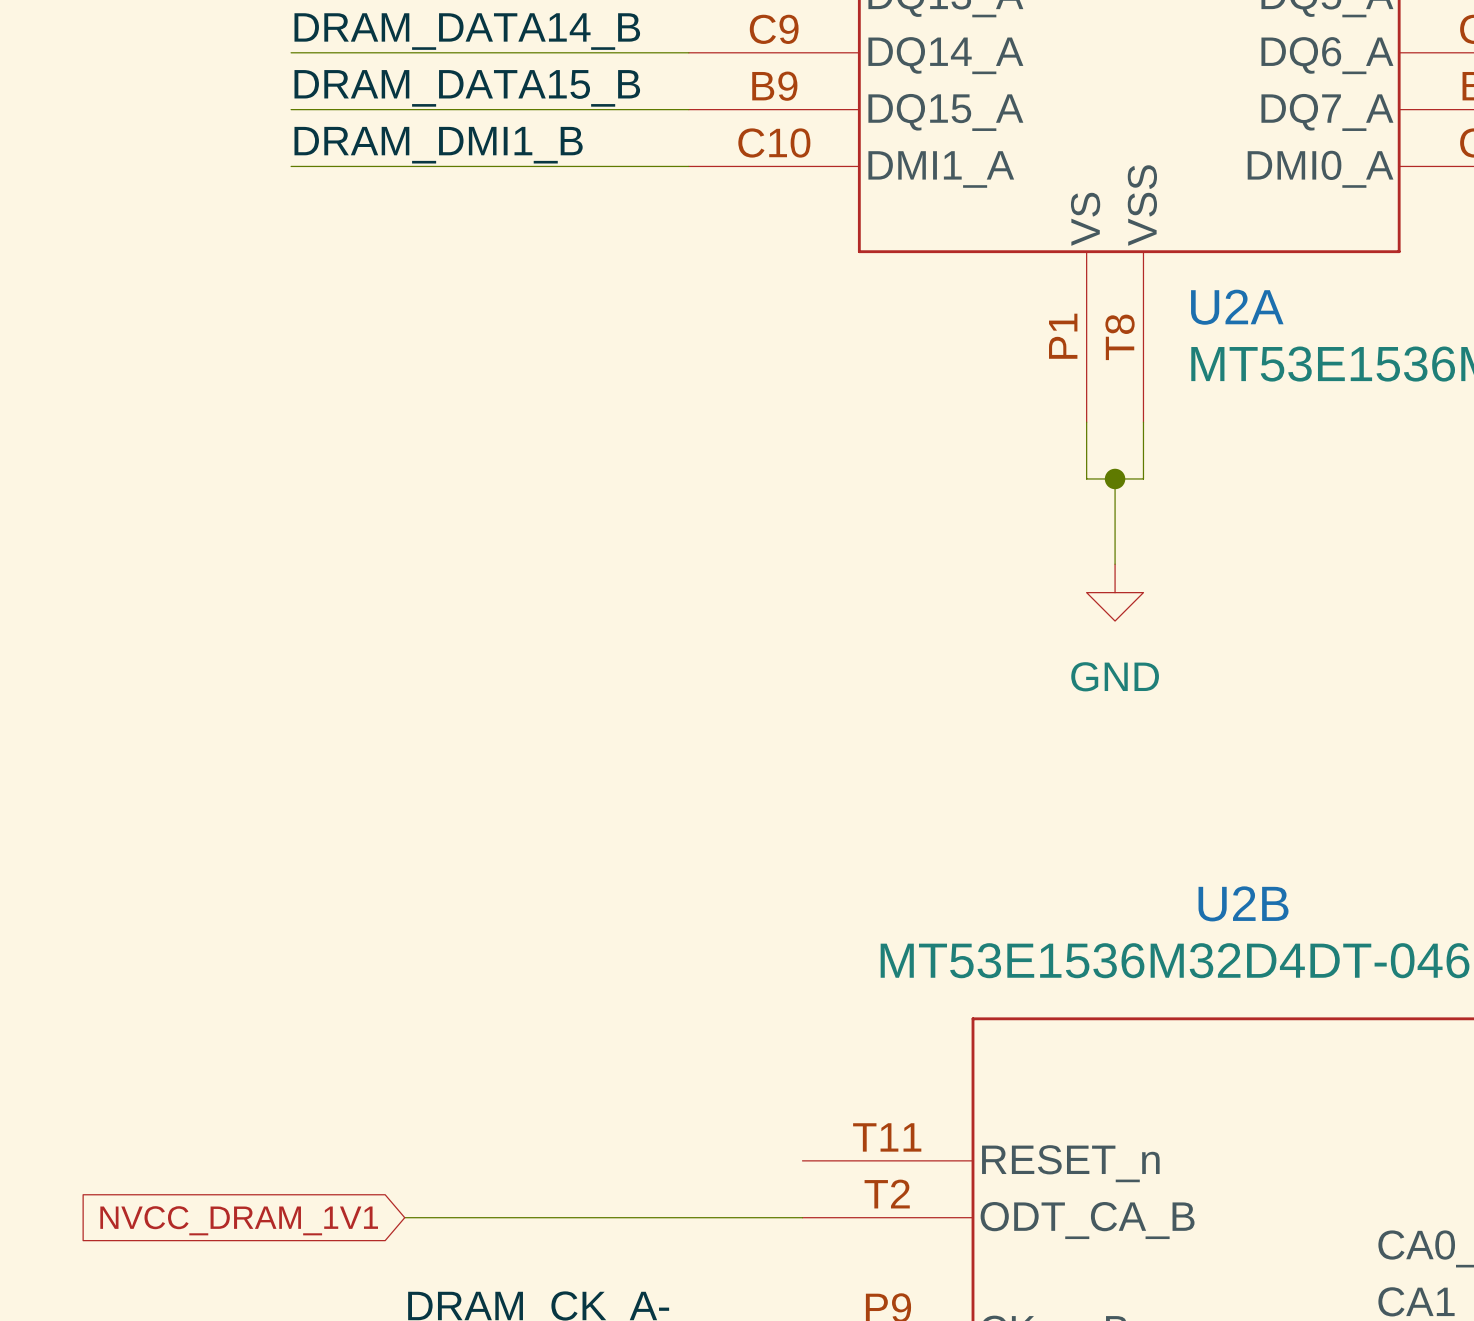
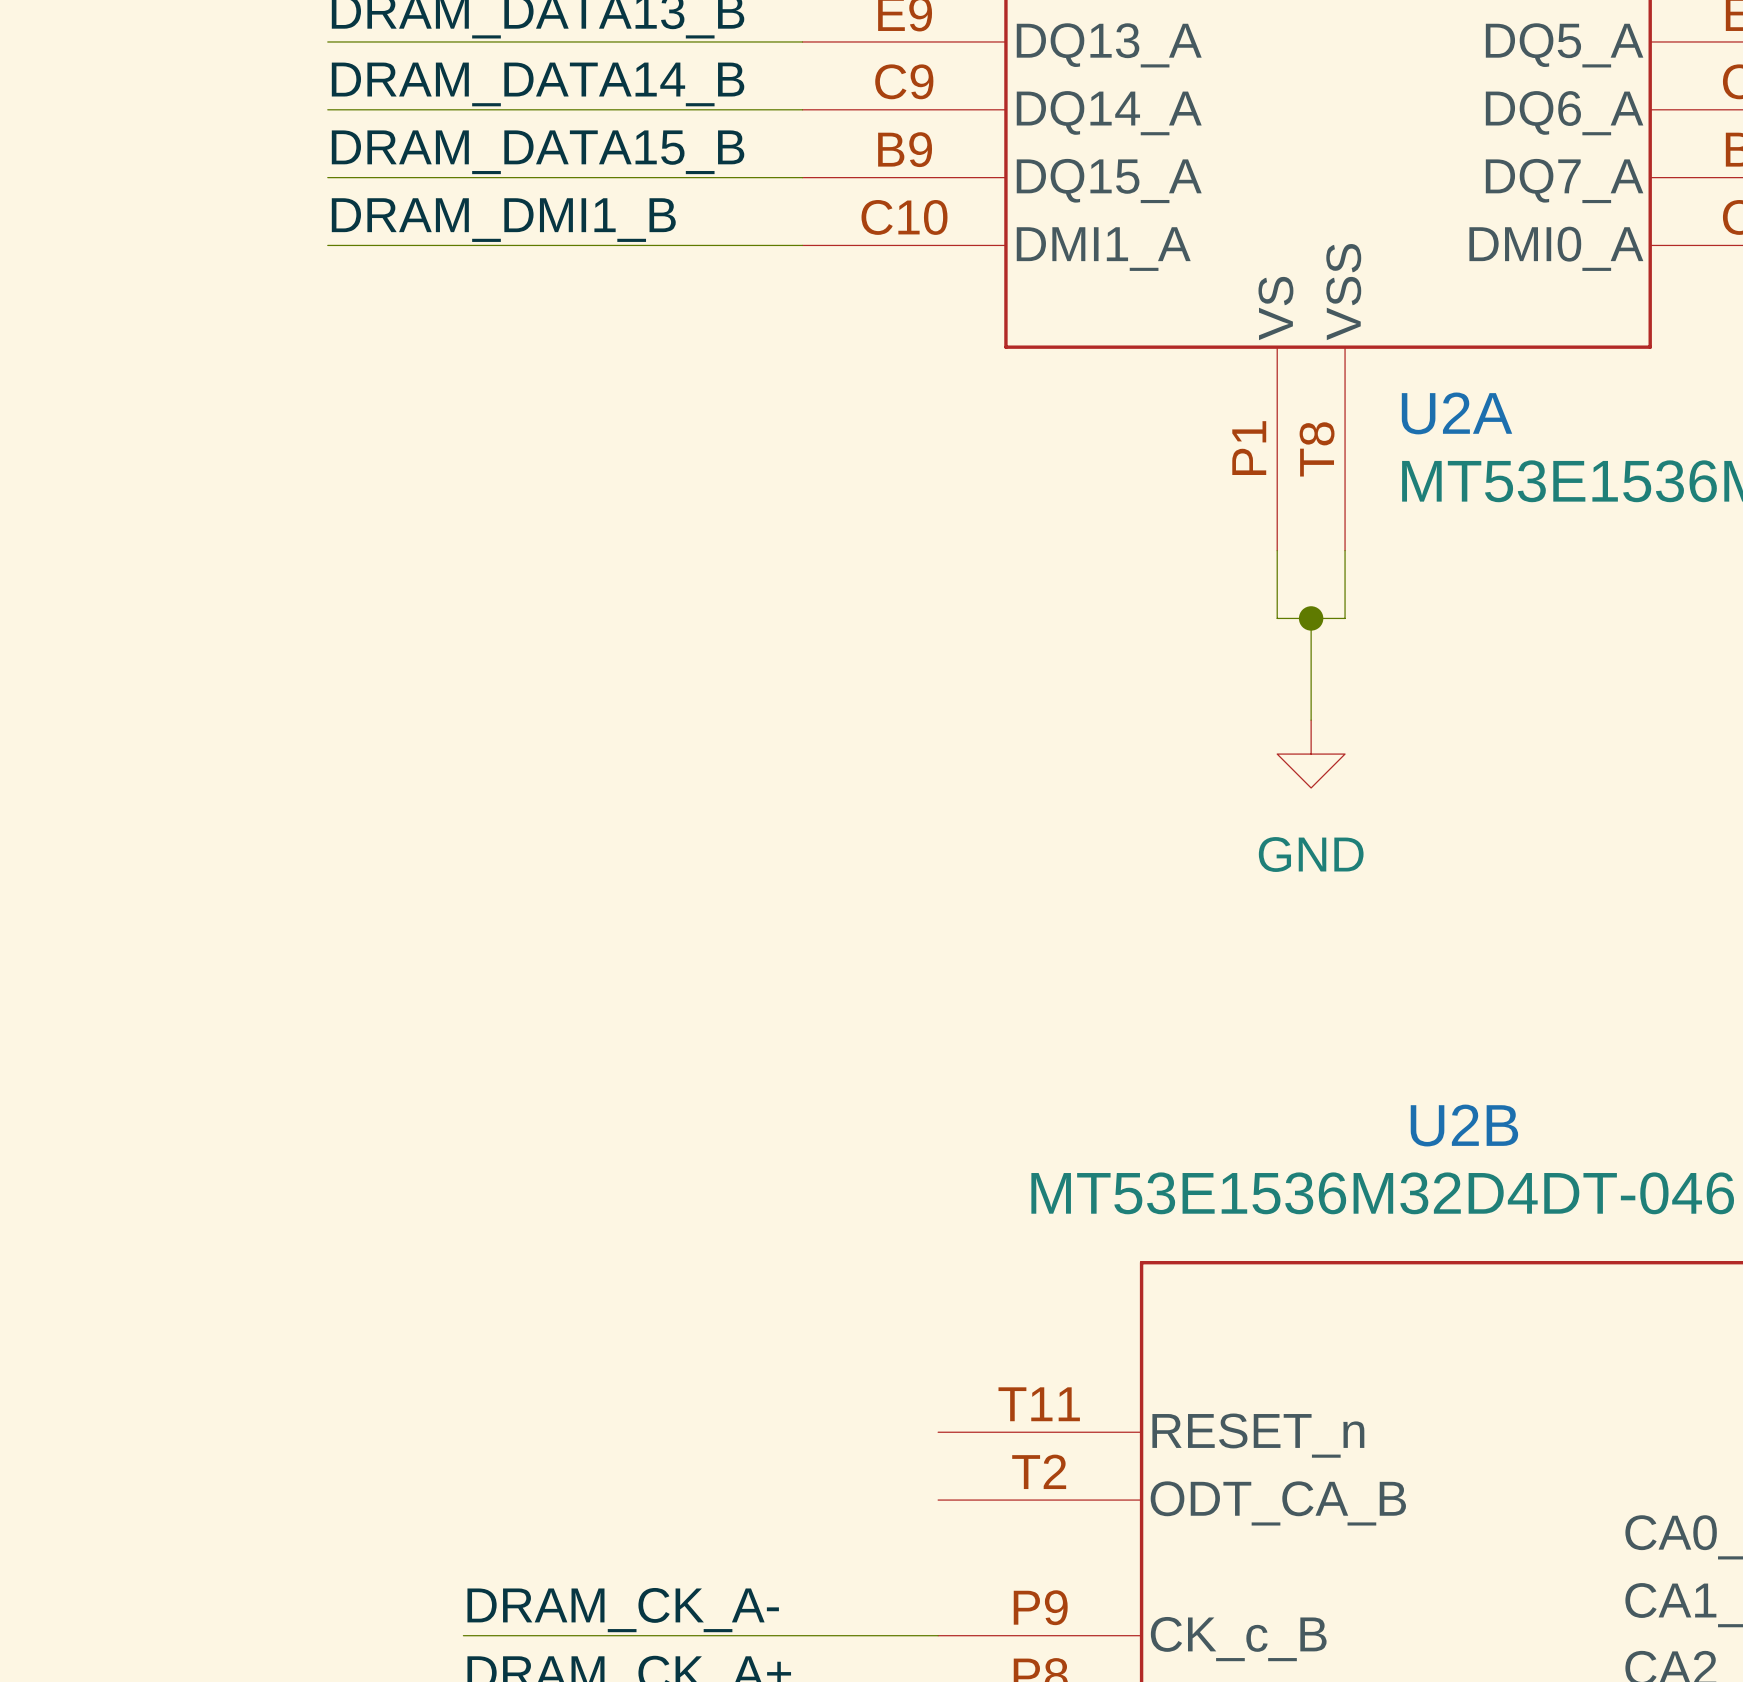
wire: (404, 1217) (802, 1217) -> none
global label: NVCC_DRAM_1V1 (239, 1220) -> none

